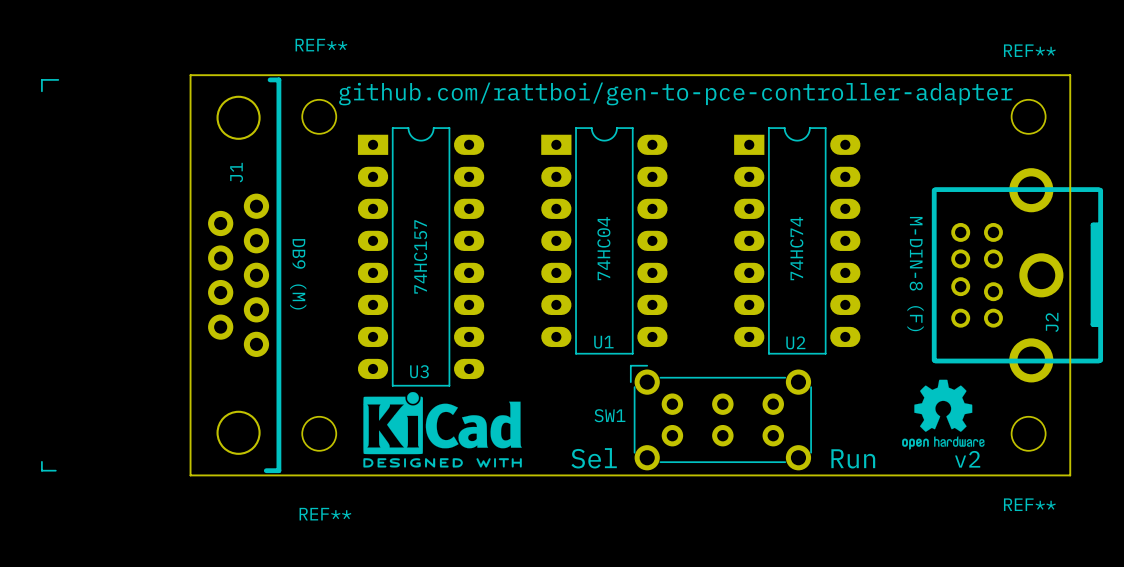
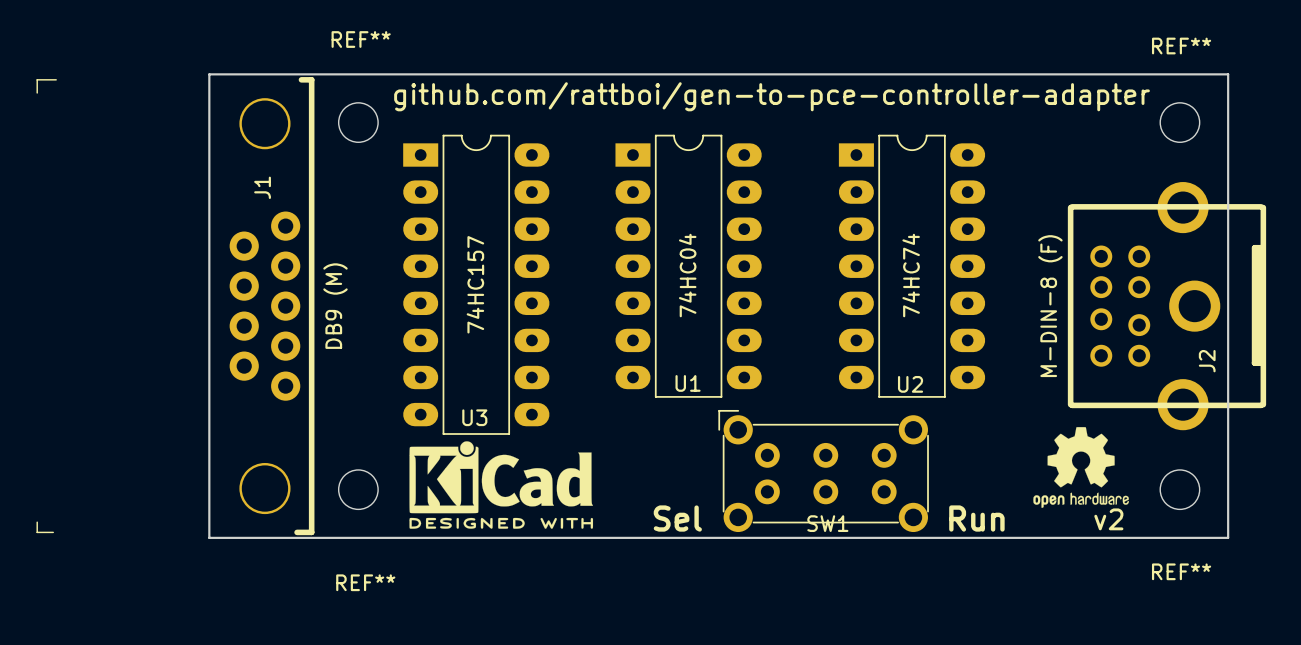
J1 value rotation: 0° (298, 274) -> 180° (335, 306)
J2 value rotation: 0° (915, 274) -> 180° (1050, 306)
SW1 name position: SW1 (609, 415) -> SW1 (827, 523)

